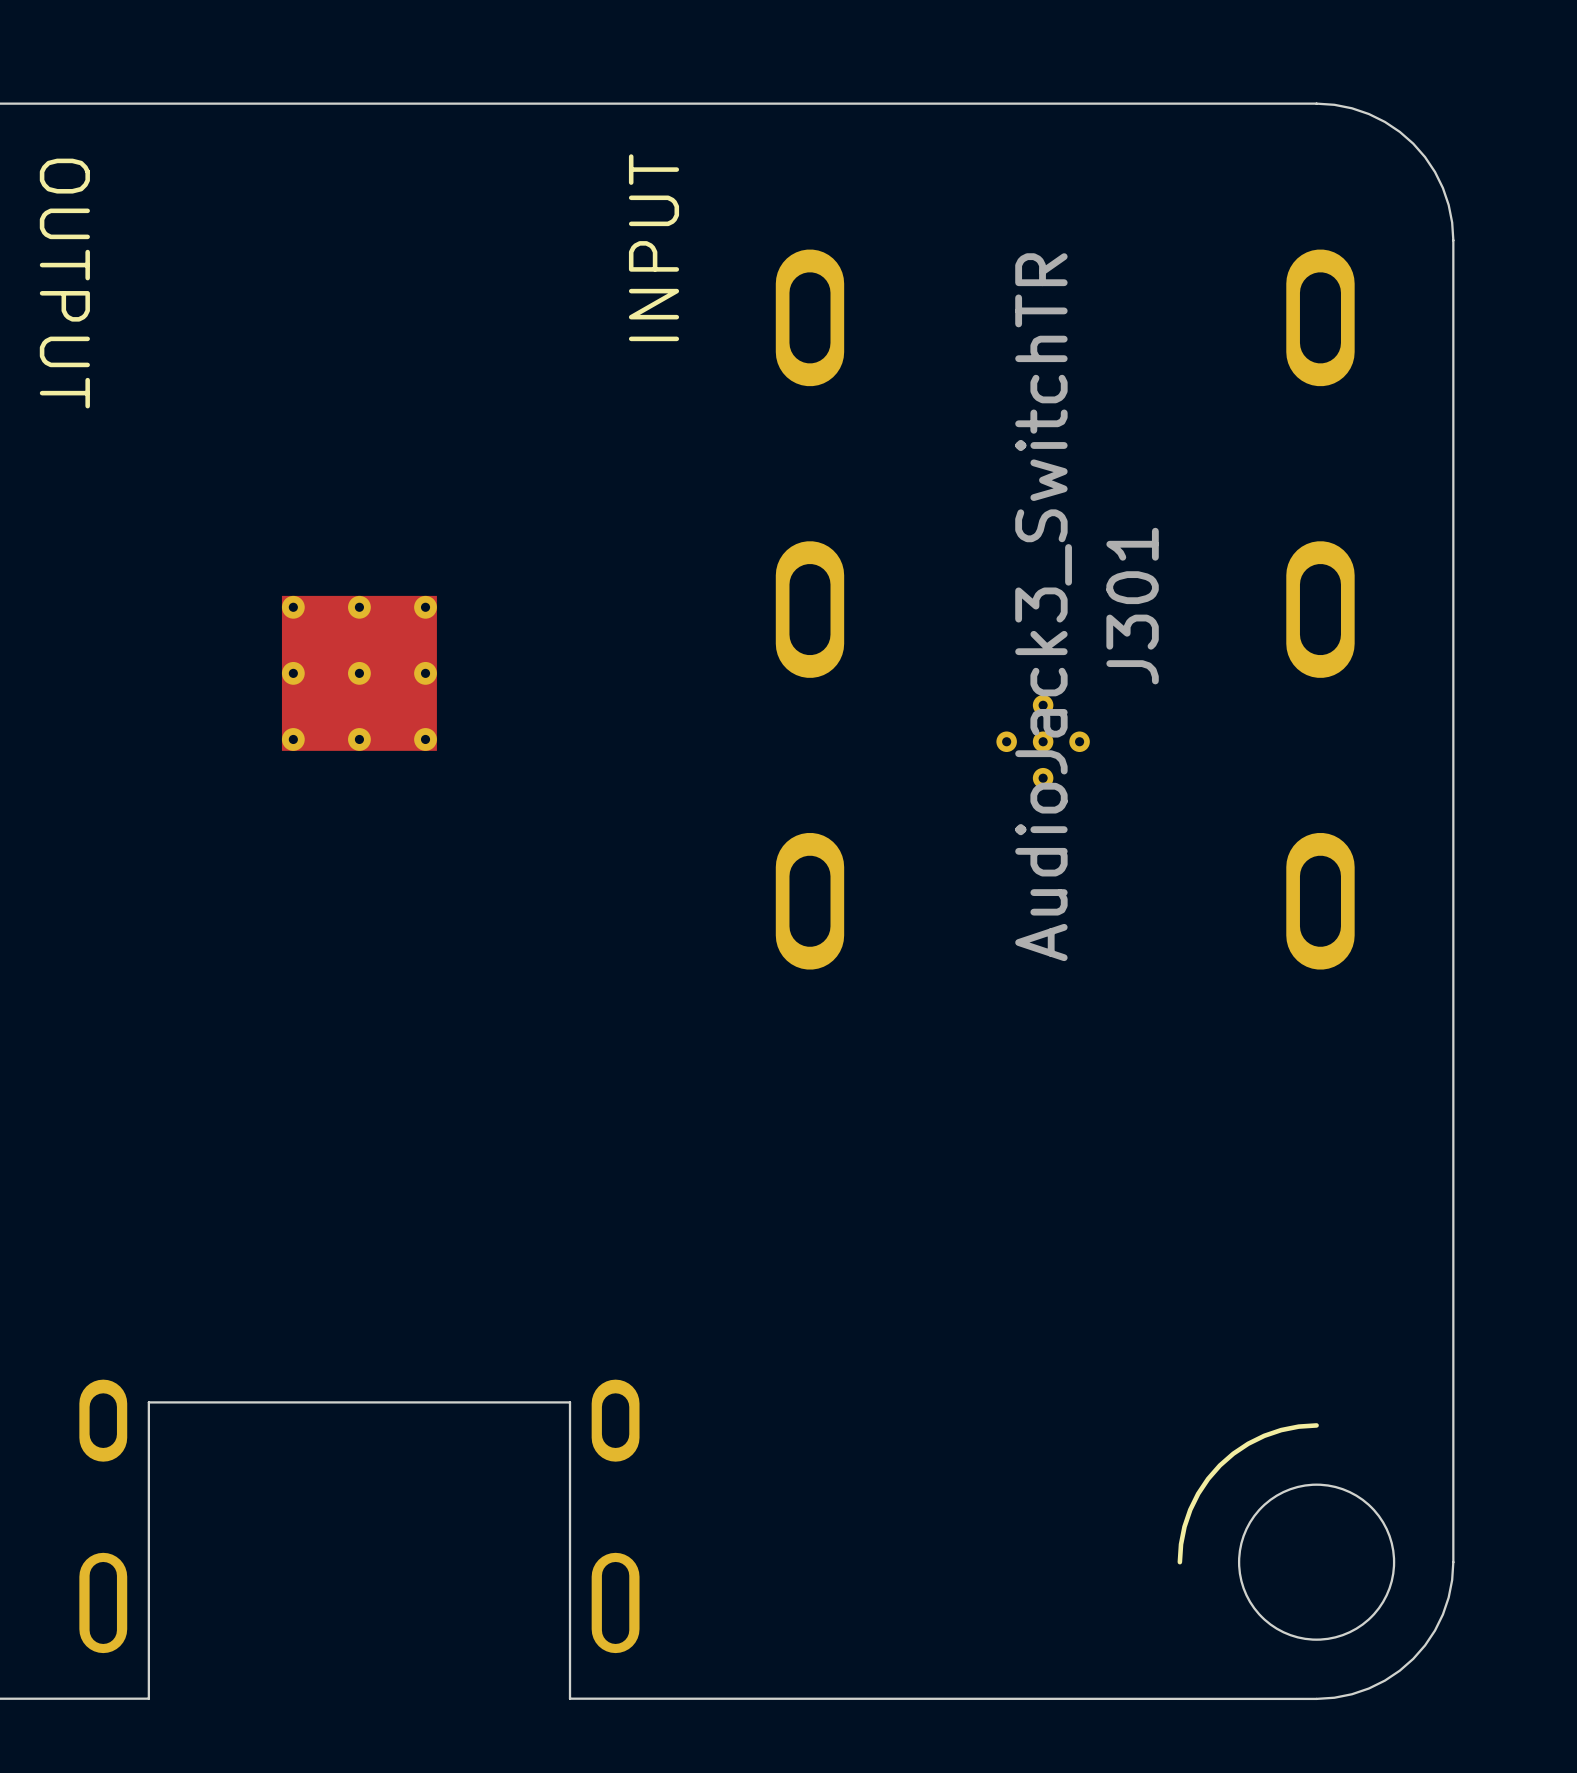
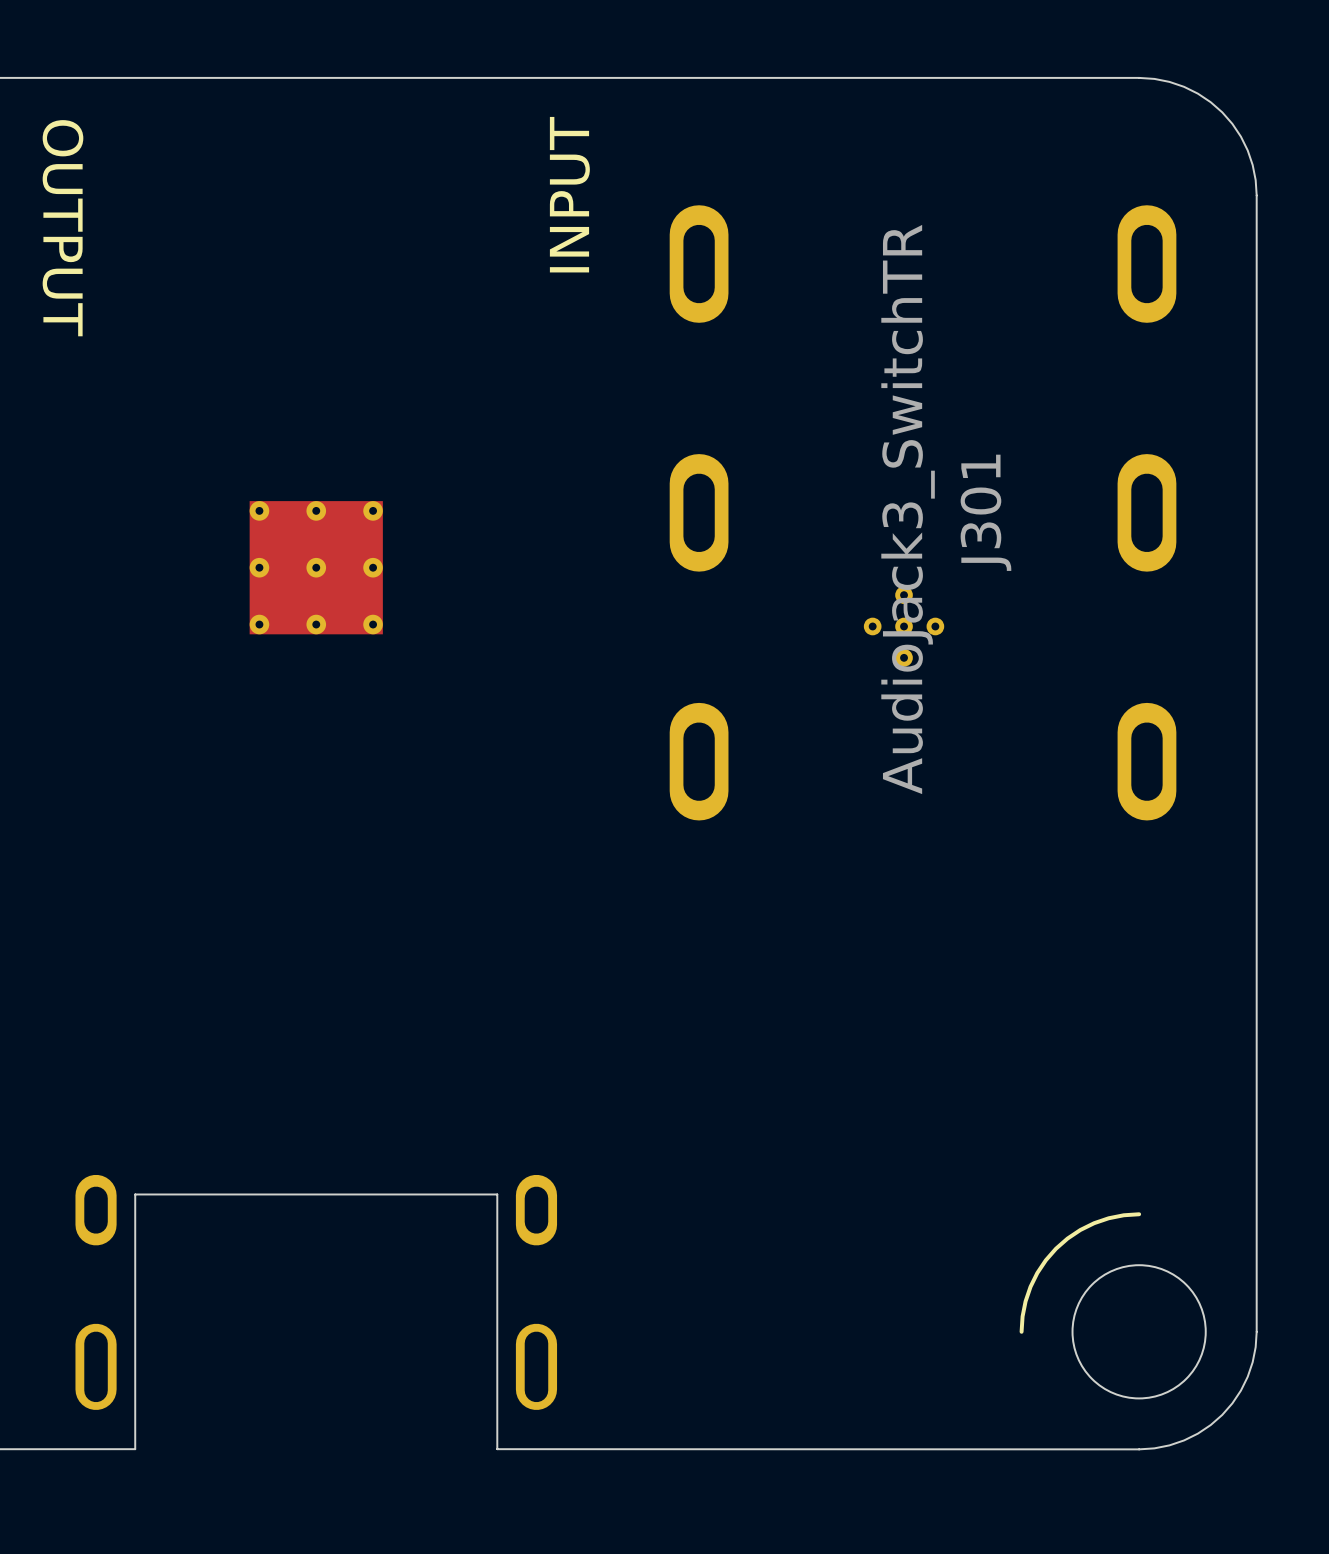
J301 footprint: [775, 249, 1355, 970] -> [669, 205, 1177, 821]

